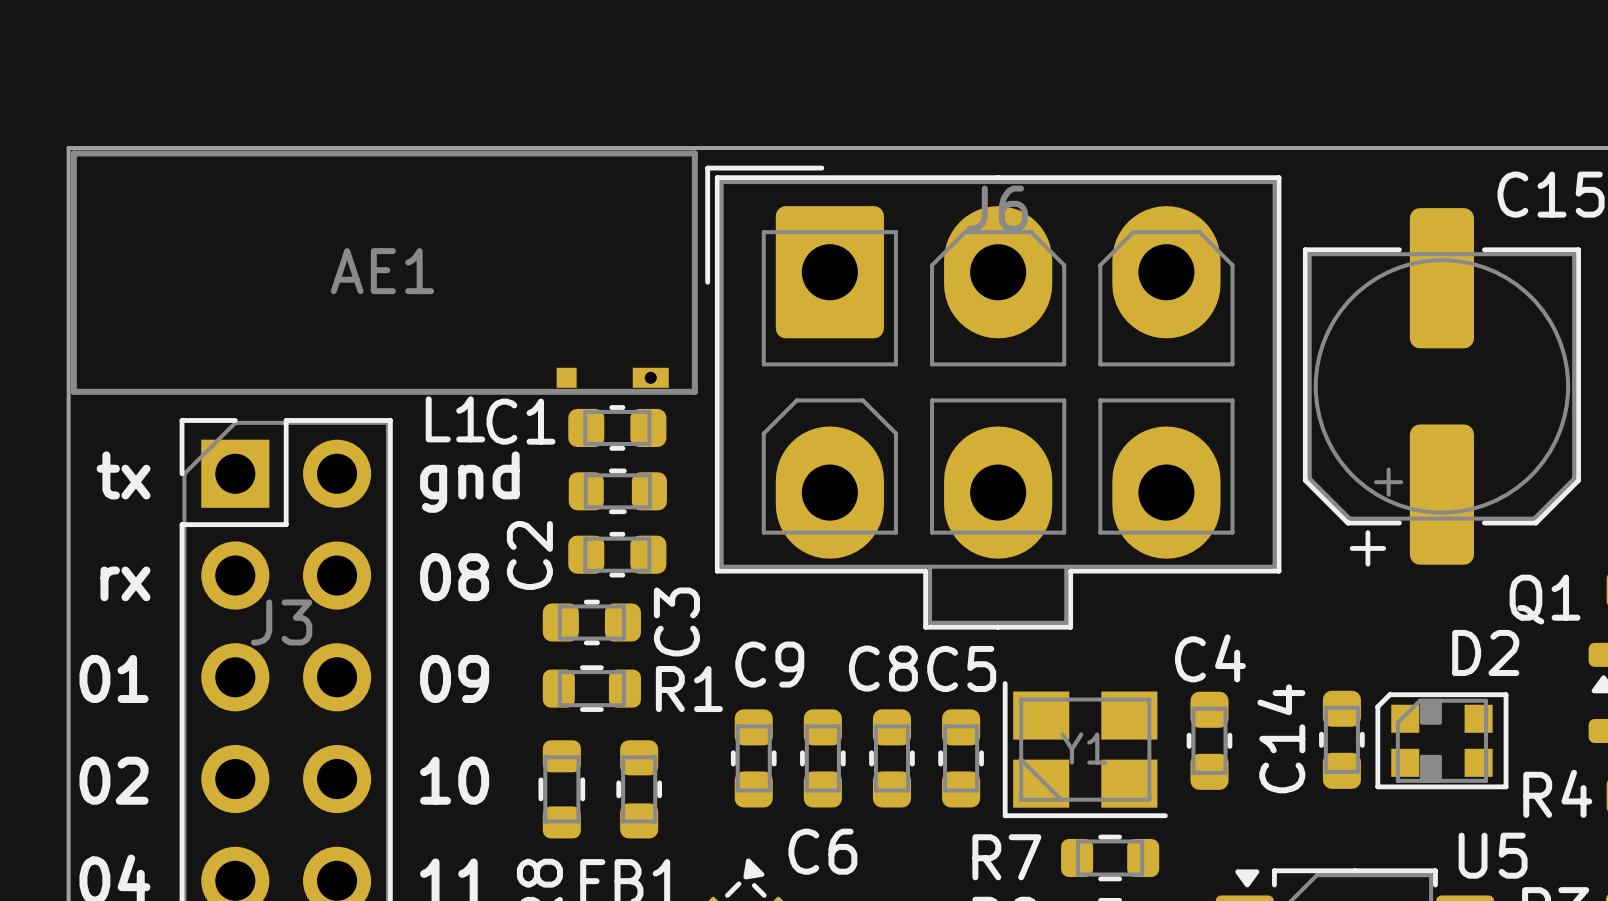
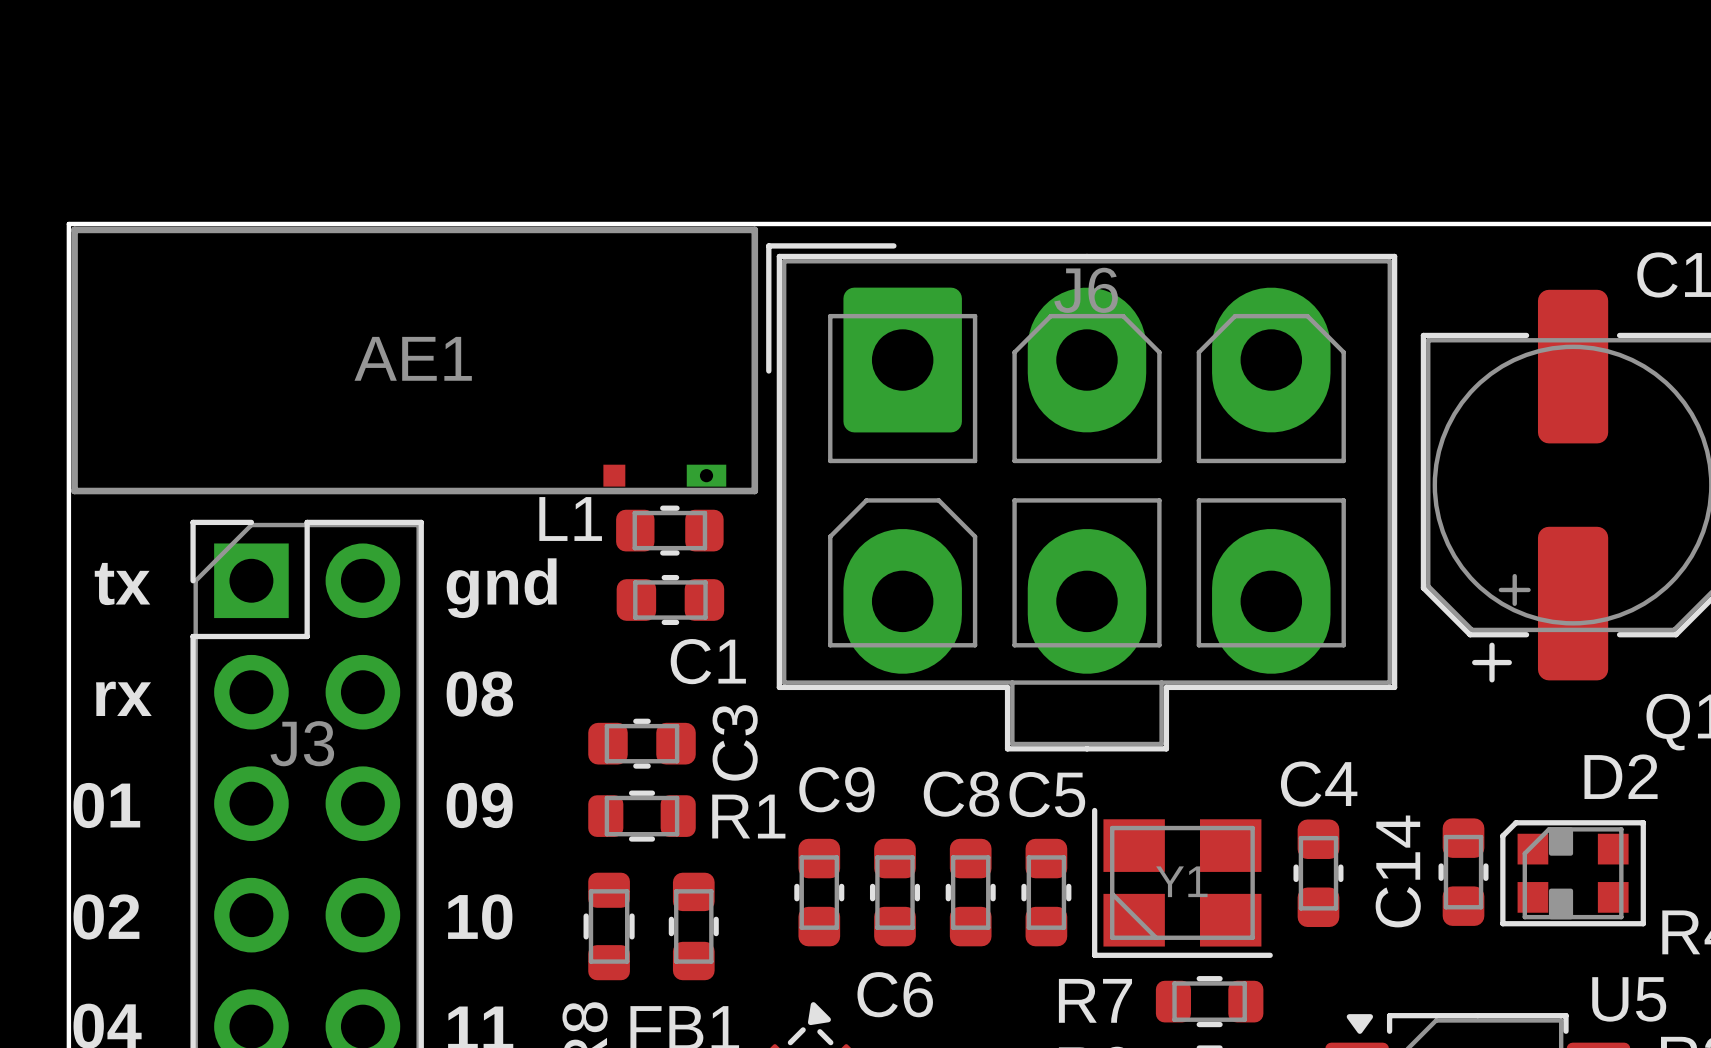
L1 name position: L1 (455, 419) -> L1 (570, 519)
C1 name position: C1 (520, 421) -> C1 (708, 661)
C1 position: (617, 427) -> (670, 599)
L1 position: (617, 491) -> (669, 530)
C2: (617, 554) -> none

